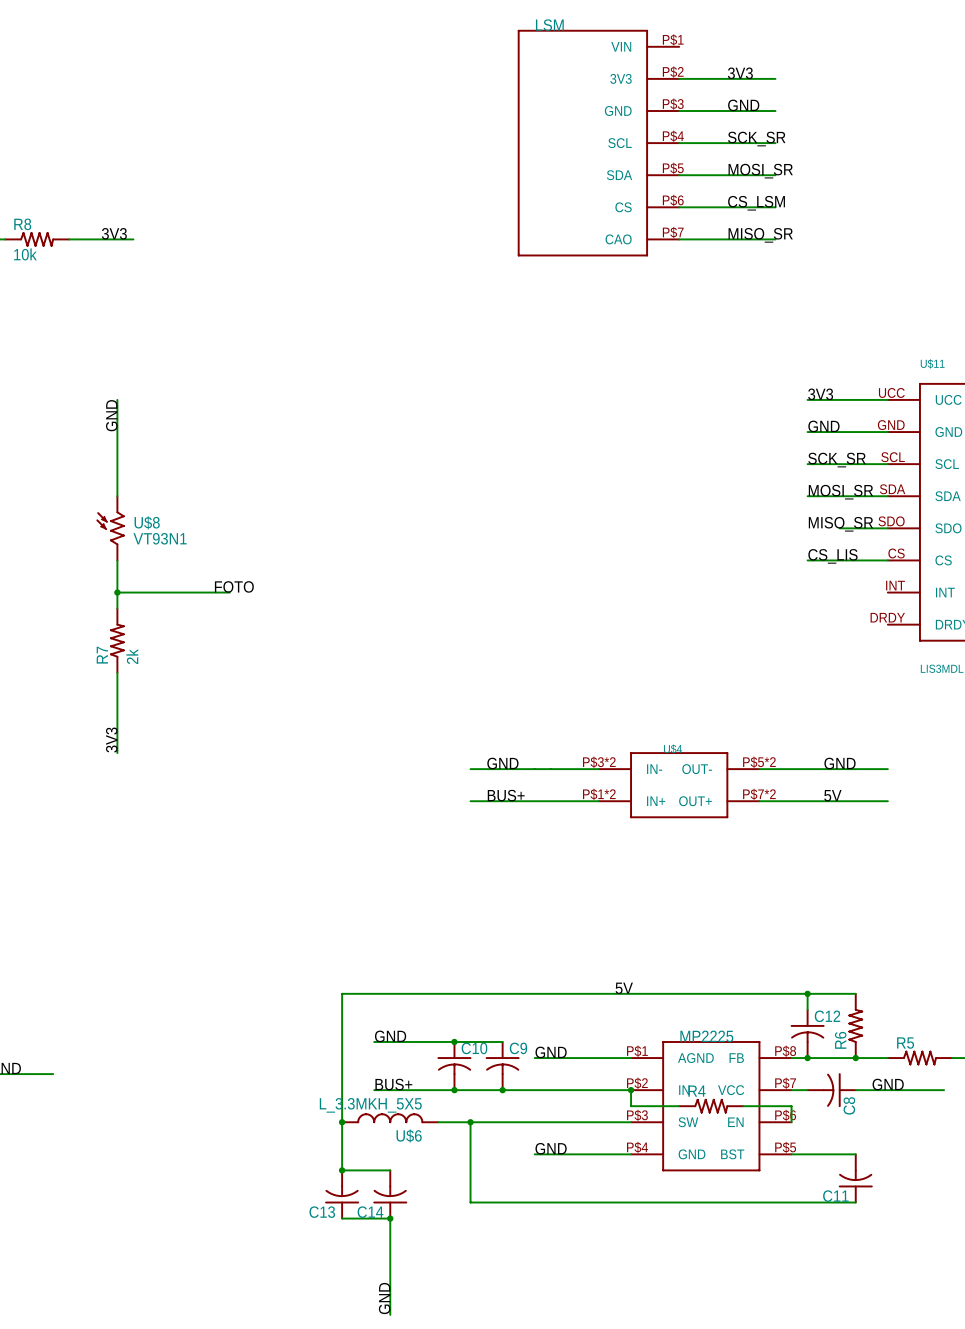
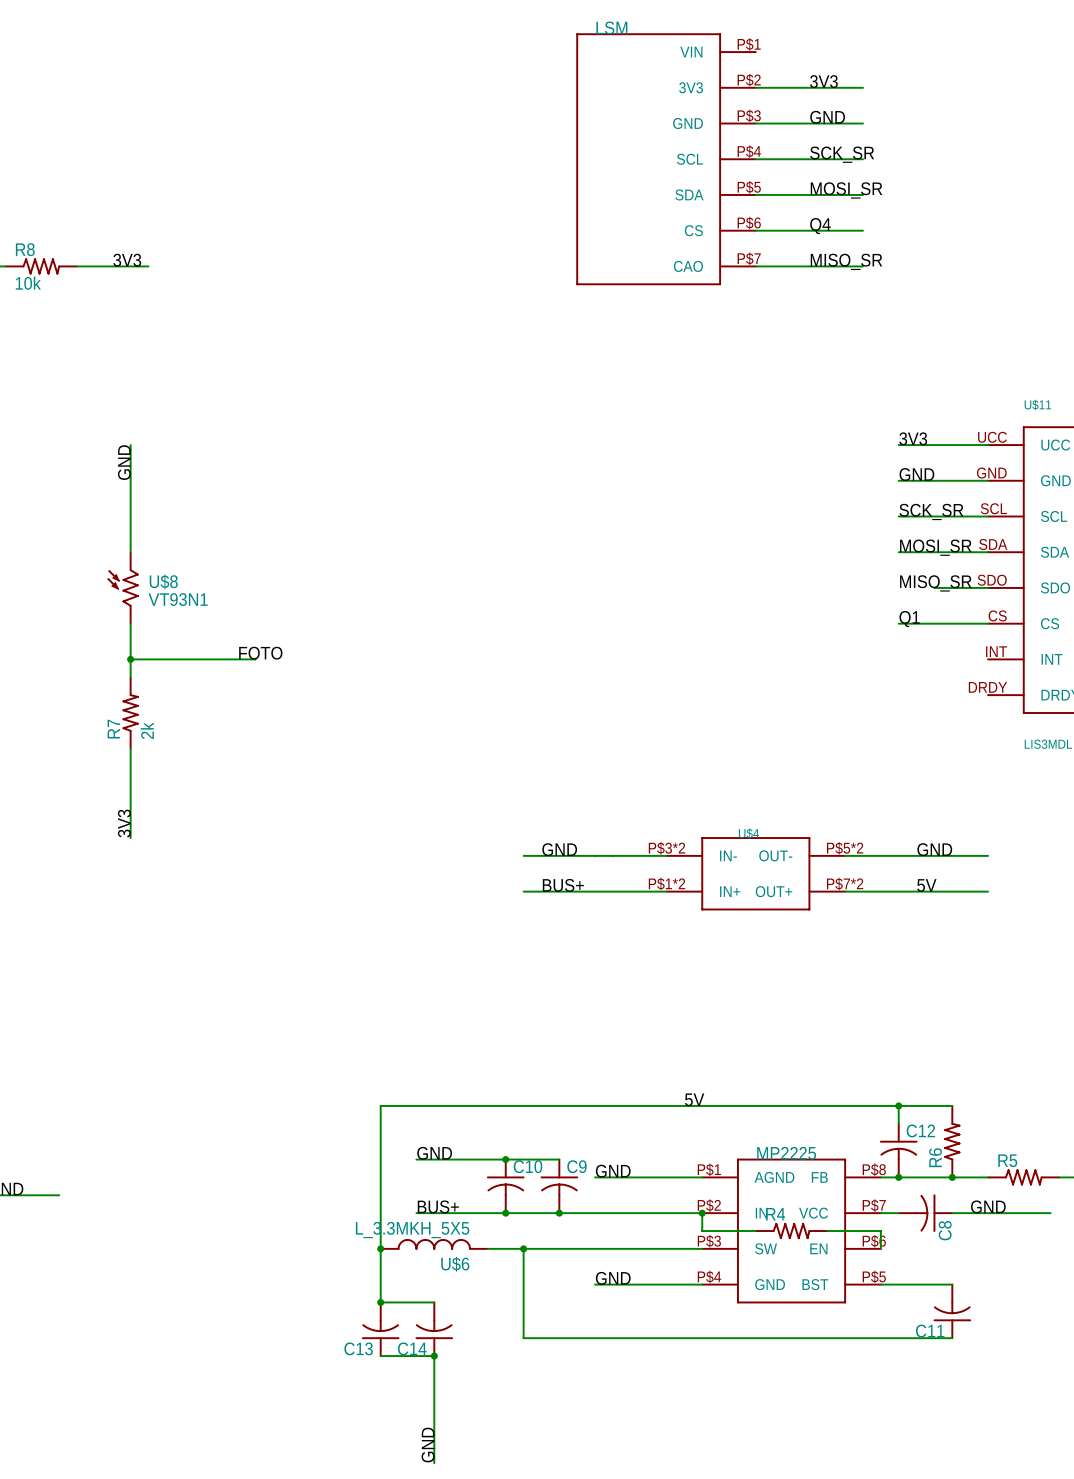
label: CS_LSM (756, 203) -> Q4 (820, 226)
label: CS_LIS (832, 556) -> Q1 (909, 619)

